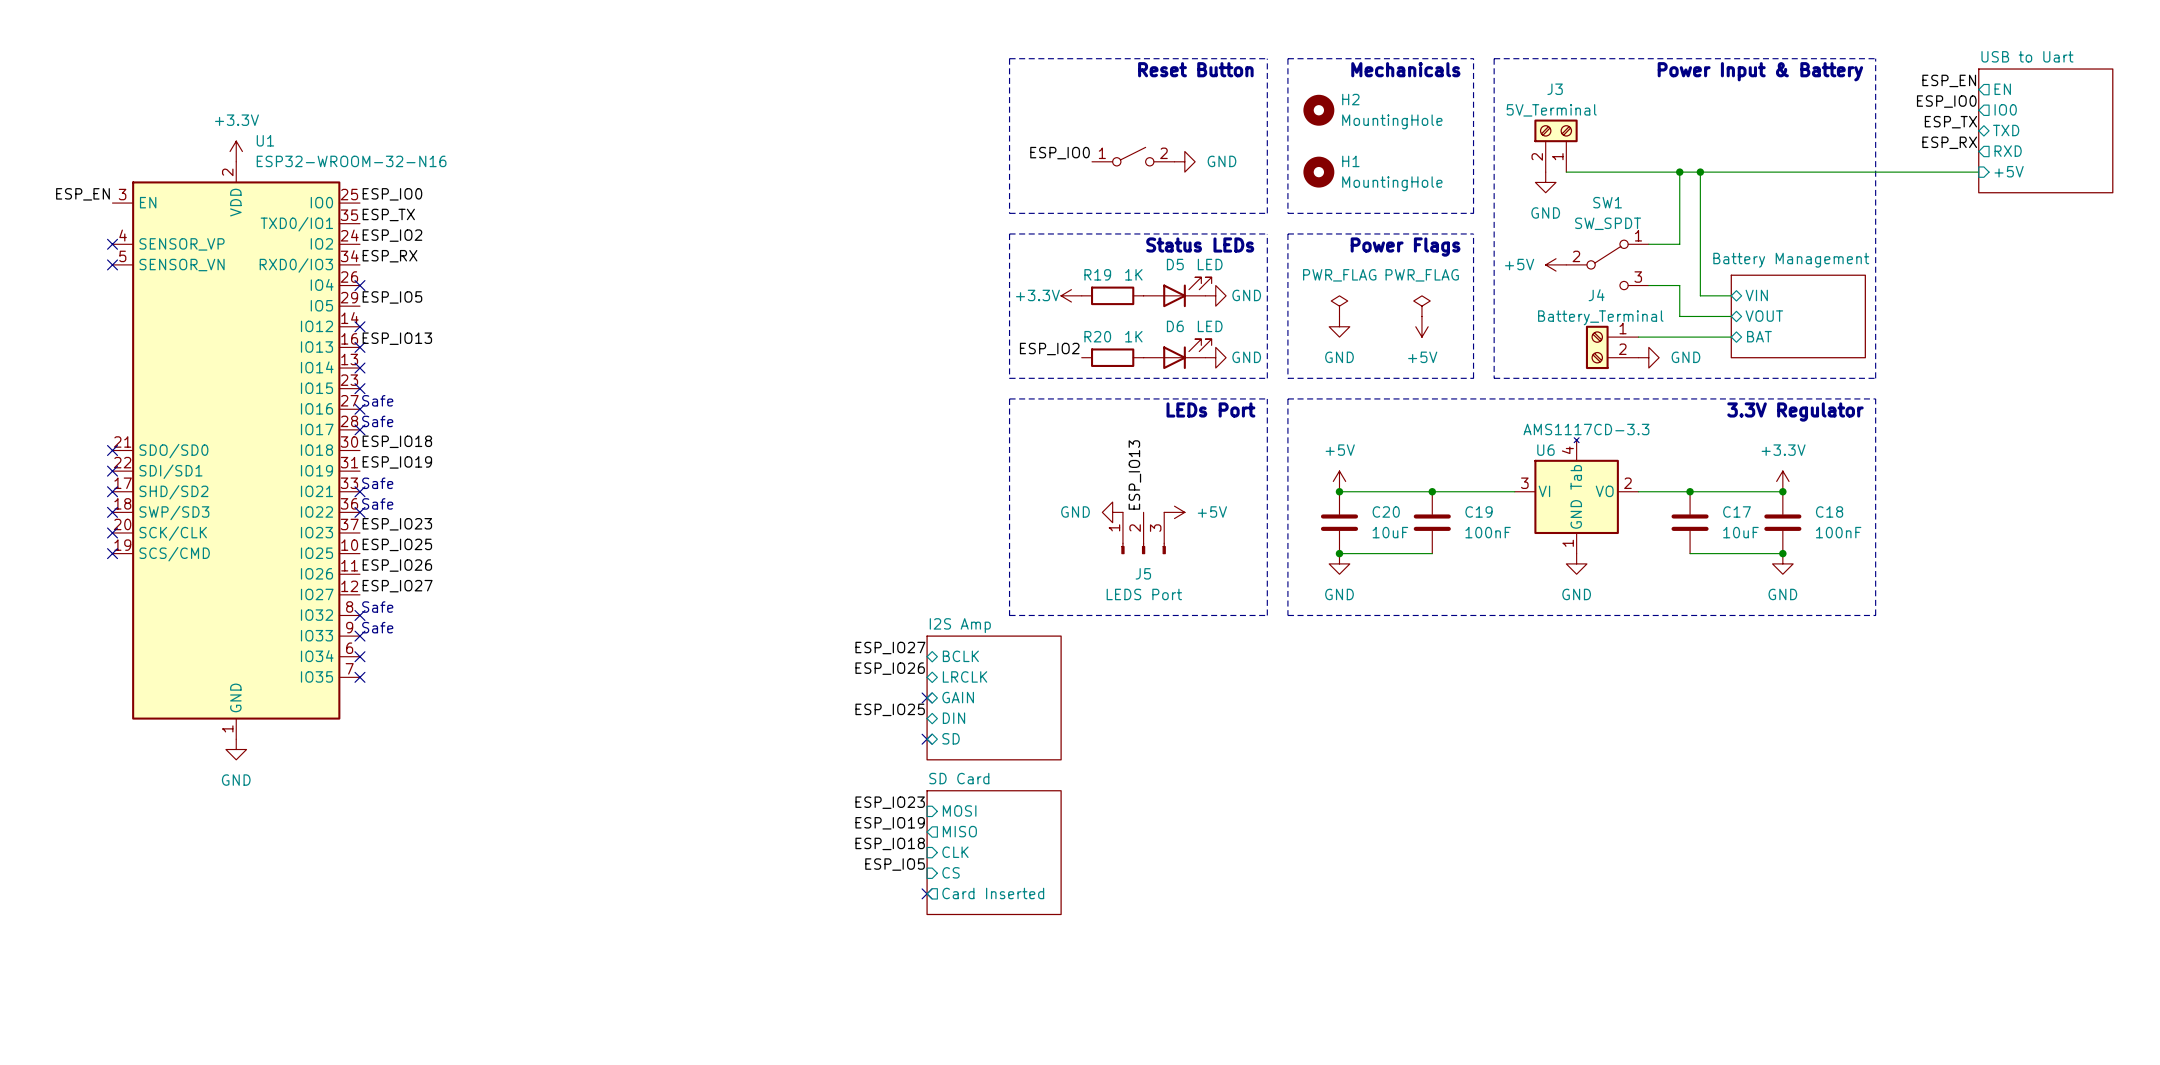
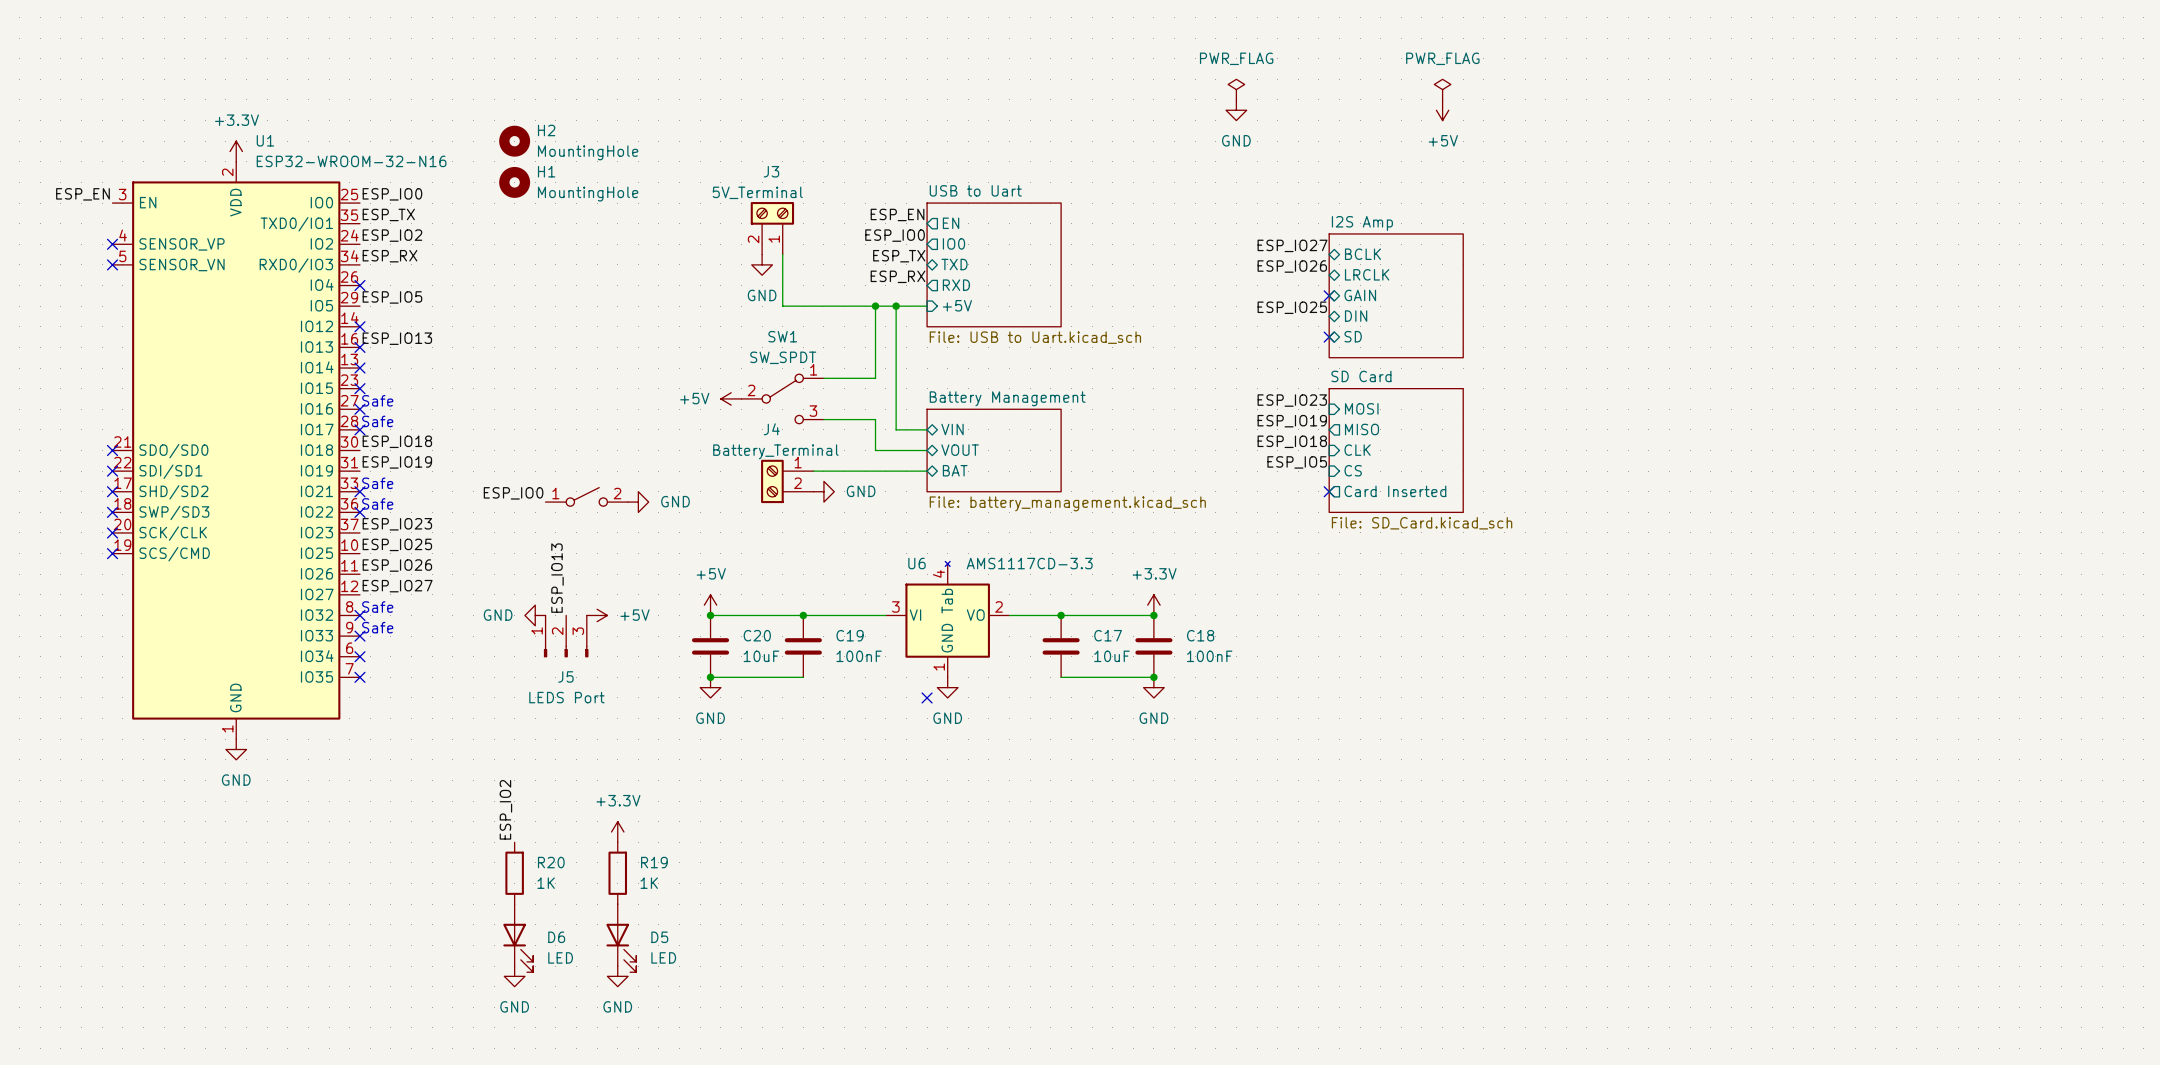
line: (1009, 58) (1267, 58) (1267, 213) (1009, 213) (1009, 58) -> none
line: (1287, 58) (1473, 58) (1473, 213) (1287, 213) (1287, 58) -> none
line: (1494, 58) (1875, 58) (1875, 378) (1494, 378) (1494, 58) -> none
text: Reset Button (1195, 69) -> none
text: Mechanicals (1405, 69) -> none
text: Power Input & Battery (1760, 71) -> none
label: ESP_EN (1949, 80) -> none
power symbol: none -> PWR_FLAG (1236, 89)
power symbol: none -> PWR_FLAG (1442, 89)
sheet pin: EN (2002, 89) -> none
label: ESP_IO0 (1946, 101) -> none
sheet pin: IO0 (2005, 109) -> none
H2 position: (1318, 110) -> (514, 141)
power symbol: none -> +5V (1442, 110)
J3 value position: 5V_Terminal (1551, 110) -> 5V_Terminal (757, 192)
label: ESP_TX (1950, 122) -> none
sheet pin: TXD (2006, 130) -> none
sheet USB to Uart: (2045, 130) -> none
label: ESP_RX (1949, 142) -> none
J3 position: (1556, 145) -> (772, 228)
sheet pin: RXD (2008, 151) -> none
label position: ESP_IO0 (1060, 153) -> ESP_IO0 (895, 235)
part: (1133, 156) -> none
power symbol rotation: 0° (1184, 161) -> 90° clockwise (1236, 110)
power symbol position: GND (1184, 161) -> GND (1236, 110)
sheet pin: +5V (2009, 171) -> none
H1 position: (1318, 172) -> (514, 182)
wire: (1566, 172) (1978, 172) -> none
wire: (1679, 172) (1679, 244) (1648, 244) -> none
junction: (1679, 172) -> none
wire: (1700, 172) (1700, 295) (1731, 295) -> none
junction: (1700, 172) -> none
power symbol: GND (1545, 182) -> none
label: none -> ESP_EN (897, 214)
sheet pin: none -> EN (951, 223)
line: (1009, 233) (1267, 233) (1267, 378) (1009, 378) (1009, 233) -> none
line: (1287, 233) (1473, 233) (1473, 378) (1287, 378) (1287, 233) -> none
sheet pin: none -> IO0 (953, 243)
text: Status LEDs (1200, 244) -> none
label: none -> ESP_IO27 (1292, 245)
text: Power Flags (1405, 247) -> none
wire: none -> (782, 254) (782, 306) (927, 306)
sheet pin: none -> BCLK (1362, 254)
label: none -> ESP_TX (899, 256)
power symbol: none -> GND (762, 264)
sheet pin: none -> TXD (954, 264)
sheet USB to Uart: none -> File: USB to Uart.kicad_sch (994, 264)
D5 value position: LED (1210, 264) -> LED (663, 957)
power symbol: +5V (1556, 264) -> none
SW1 position: (1607, 264) -> (782, 398)
label: none -> ESP_IO26 (1292, 266)
R19 name position: R19 (1097, 274) -> R19 (654, 862)
R19 value position: 1K (1133, 274) -> 1K (649, 883)
sheet pin: none -> LRCLK (1367, 274)
label: none -> ESP_RX (898, 276)
sheet pin: none -> RXD (956, 285)
wire: (1648, 285) (1679, 285) (1679, 316) (1731, 316) -> none
D5 position: (1177, 292) -> (621, 938)
D5 rotation: 0° (1187, 292) -> 90° clockwise (621, 947)
power symbol: +3.3V (1071, 295) -> none
R19 rotation: 0° (1112, 295) -> 90° clockwise (617, 873)
R19 position: (1112, 295) -> (617, 873)
power symbol: GND (1215, 295) -> none
no-connect mark: none -> (1329, 295)
sheet pin: none -> GAIN (1360, 295)
sheet pin: VIN (1756, 295) -> none
sheet pin: none -> +5V (957, 305)
wire: none -> (875, 306) (875, 378) (823, 378)
junction: none -> (875, 306)
wire: none -> (896, 306) (896, 429) (927, 429)
junction: none -> (896, 306)
power symbol: PWR_FLAG (1339, 306) -> none
power symbol: PWR_FLAG (1421, 306) -> none
label: none -> ESP_IO25 (1292, 307)
sheet pin: none -> DIN (1356, 316)
sheet pin: VOUT (1764, 316) -> none
sheet Battery Management: (1798, 316) -> none
D6 value position: LED (1210, 326) -> LED (560, 957)
power symbol: GND (1339, 326) -> none
power symbol: +5V (1421, 326) -> none
R20 name position: R20 (1097, 336) -> R20 (551, 862)
R20 value position: 1K (1133, 336) -> 1K (546, 883)
sheet pin: none -> SD (1353, 336)
sheet pin: BAT (1759, 336) -> none
no-connect mark: none -> (1329, 337)
wire: (1638, 337) (1731, 337) -> none
J4 position: (1612, 347) -> (787, 481)
label: ESP_IO2 (1049, 349) -> none
D6 position: (1177, 354) -> (518, 938)
D6 rotation: 0° (1187, 354) -> 90° clockwise (518, 947)
R20 rotation: 0° (1112, 357) -> 90° clockwise (514, 873)
R20 position: (1112, 357) -> (514, 873)
power symbol: GND (1215, 357) -> none
power symbol: GND (1648, 357) -> none
power symbol: none -> +5V (731, 398)
line: (1009, 398) (1009, 615) (1267, 615) (1267, 398) (1009, 398) -> none
line: (1287, 398) (1287, 615) (1875, 615) (1875, 398) (1287, 398) -> none
label: none -> ESP_IO23 (1292, 400)
sheet pin: none -> MOSI (1361, 408)
text: LEDs Port (1210, 409) -> none
text: 3.3V Regulator (1795, 411) -> none
wire: none -> (823, 419) (875, 419) (875, 450) (927, 450)
label: none -> ESP_IO19 (1292, 421)
sheet pin: none -> VIN (952, 429)
sheet pin: none -> MISO (1361, 429)
U6 value position: AMS1117CD-3.3 (1586, 429) -> AMS1117CD-3.3 (1029, 563)
label: none -> ESP_IO18 (1292, 441)
sheet pin: none -> VOUT (960, 450)
sheet Battery Management: none -> File: battery_management.kicad_sch (994, 450)
sheet pin: none -> CLK (1357, 450)
sheet SD Card: none -> File: SD_Card.kicad_sch (1396, 450)
U6 name position: U6 (1545, 450) -> U6 (917, 563)
label: none -> ESP_IO5 (1297, 462)
sheet pin: none -> BAT (955, 470)
sheet pin: none -> CS (1353, 470)
wire: none -> (813, 471) (927, 471)
label: ESP_IO13 (1134, 474) -> none
power symbol: +5V (1339, 481) -> none
power symbol: +3.3V (1782, 481) -> none
power symbol: none -> GND (823, 491)
no-connect mark: none -> (1329, 491)
wire: (1339, 491) (1514, 491) -> none
junction: (1339, 491) -> none
sheet pin: none -> Card Inserted (1395, 491)
junction: (1432, 491) -> none
wire: (1638, 491) (1782, 491) -> none
junction: (1690, 491) -> none
junction: (1782, 491) -> none
label: none -> ESP_IO0 (513, 493)
U6 position: (1576, 495) -> (947, 619)
part: none -> (586, 496)
power symbol: none -> GND (638, 502)
power symbol: GND (1112, 512) -> none
power symbol: +5V (1174, 512) -> none
C20 position: (1339, 522) -> (710, 646)
C19 position: (1432, 522) -> (803, 646)
C17 position: (1690, 522) -> (1061, 646)
C18 position: (1782, 522) -> (1153, 646)
J5 position: (1143, 533) -> (566, 636)
wire: (1339, 553) (1432, 553) -> none
junction: (1339, 553) -> none
wire: (1690, 553) (1782, 553) -> none
junction: (1782, 553) -> none
power symbol: GND (1339, 563) -> none
power symbol: GND (1576, 563) -> none
power symbol: GND (1782, 563) -> none
label: none -> ESP_IO13 (557, 578)
power symbol: none -> +5V (710, 605)
power symbol: none -> +3.3V (1153, 605)
power symbol: none -> GND (535, 615)
power symbol: none -> +5V (597, 615)
wire: none -> (710, 615) (885, 615)
junction: none -> (710, 615)
junction: none -> (803, 615)
junction: none -> (1061, 615)
junction: none -> (1153, 615)
label: ESP_IO27 (890, 648) -> none
sheet pin: BCLK (960, 656) -> none
label: ESP_IO26 (890, 668) -> none
sheet pin: LRCLK (965, 676) -> none
wire: none -> (710, 677) (803, 677)
junction: none -> (710, 677)
wire: none -> (1061, 677) (1153, 677)
junction: none -> (1153, 677)
power symbol: none -> GND (710, 687)
power symbol: none -> GND (947, 687)
power symbol: none -> GND (1153, 687)
sheet pin: GAIN (958, 697) -> none
sheet I2S Amp position: (994, 697) -> (1396, 295)
label: ESP_IO25 (890, 709) -> none
sheet pin: DIN (953, 718) -> none
sheet pin: SD (951, 738) -> none
no-connect mark: (927, 739) -> none
label: ESP_IO23 (890, 802) -> none
label: none -> ESP_IO2 (505, 809)
sheet pin: MOSI (959, 810) -> none
label: ESP_IO19 (890, 823) -> none
sheet pin: MISO (959, 831) -> none
power symbol: none -> +3.3V (617, 832)
label: ESP_IO18 (890, 843) -> none
sheet pin: CLK (955, 852) -> none
sheet SD Card: (994, 852) -> none
label: ESP_IO5 (895, 864) -> none
sheet pin: CS (951, 872) -> none
no-connect mark: (927, 893) -> none
sheet pin: Card Inserted (993, 893) -> none
power symbol: none -> GND (514, 976)
power symbol: none -> GND (617, 976)

